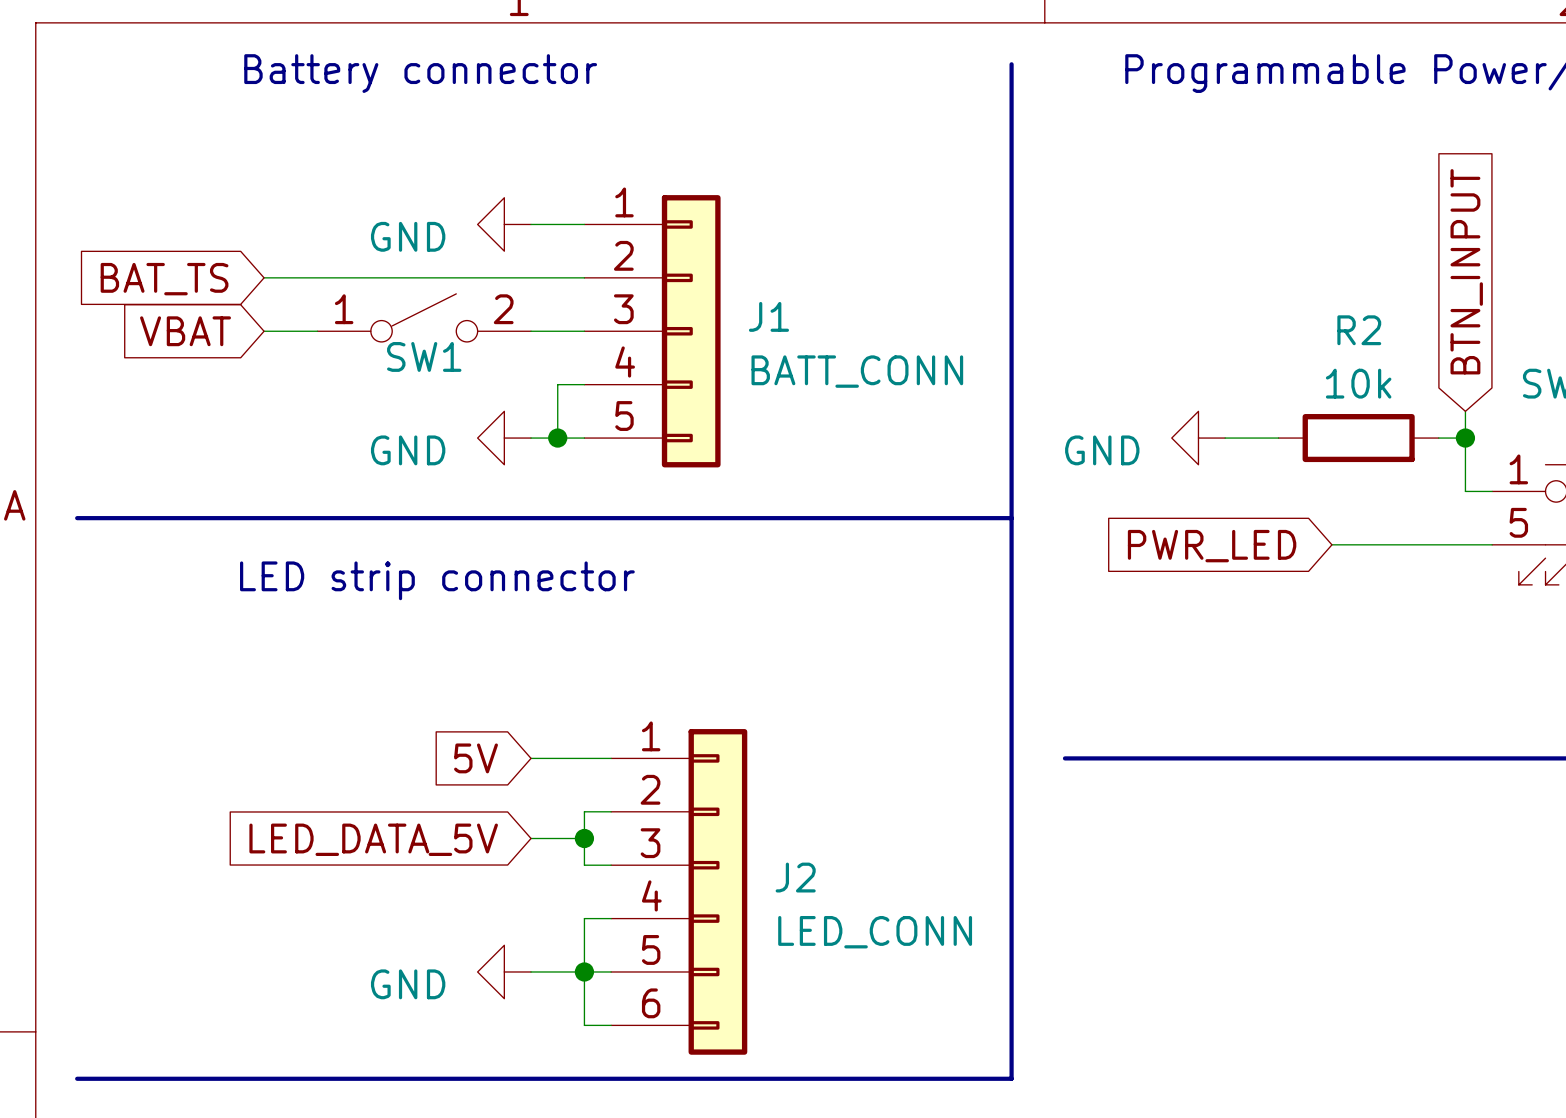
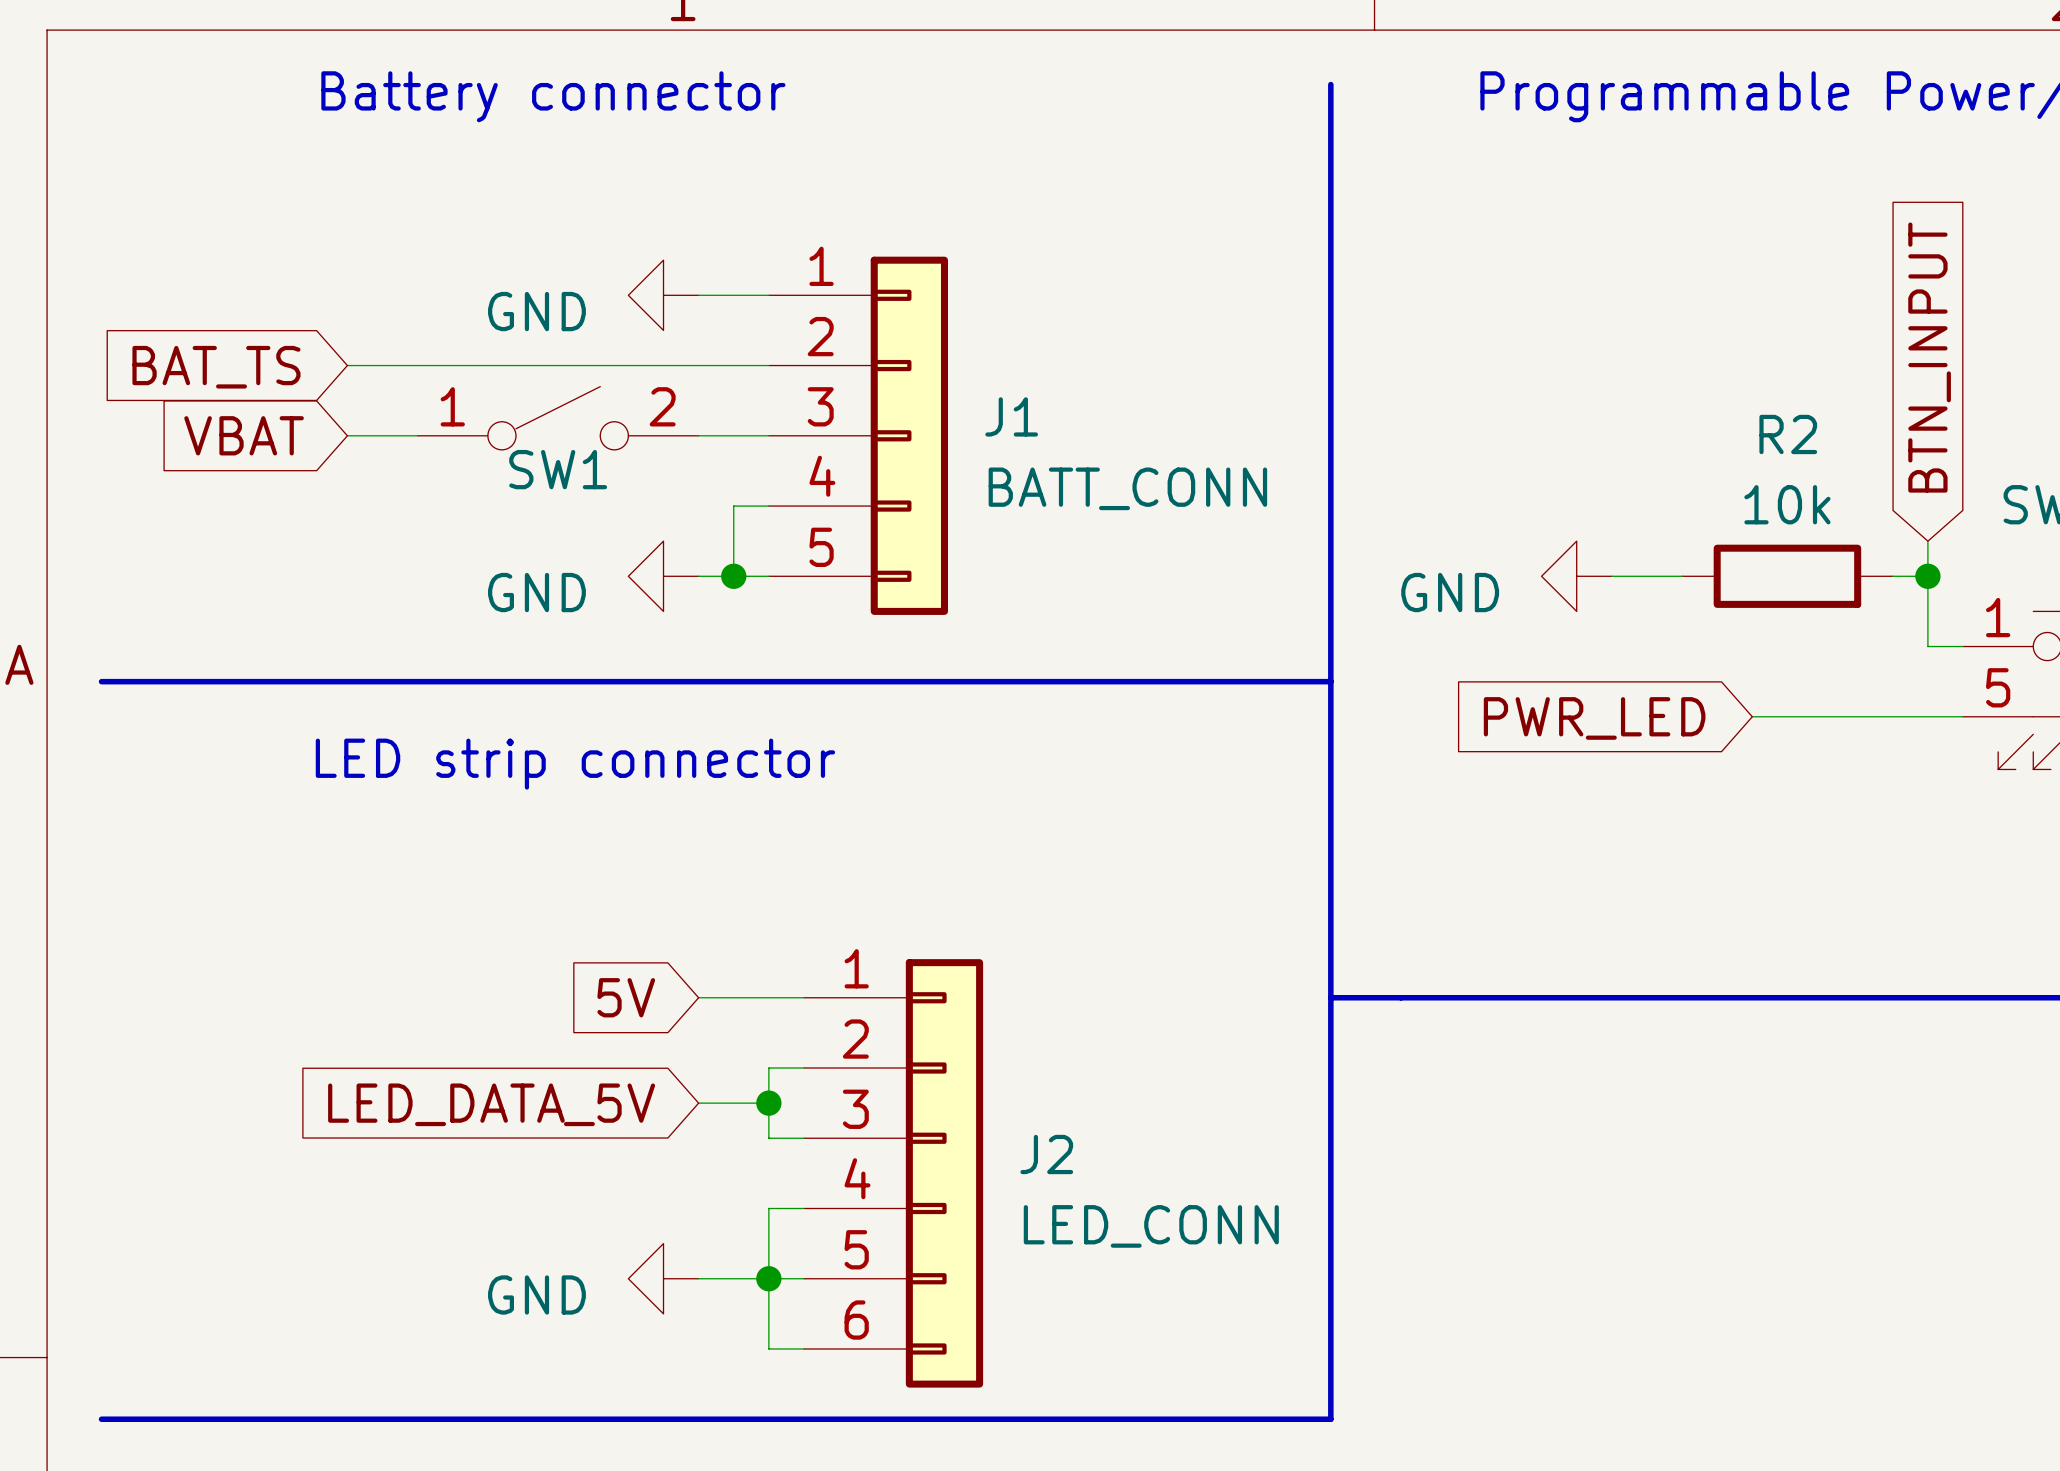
line: none -> (1330, 997) (1401, 997)

